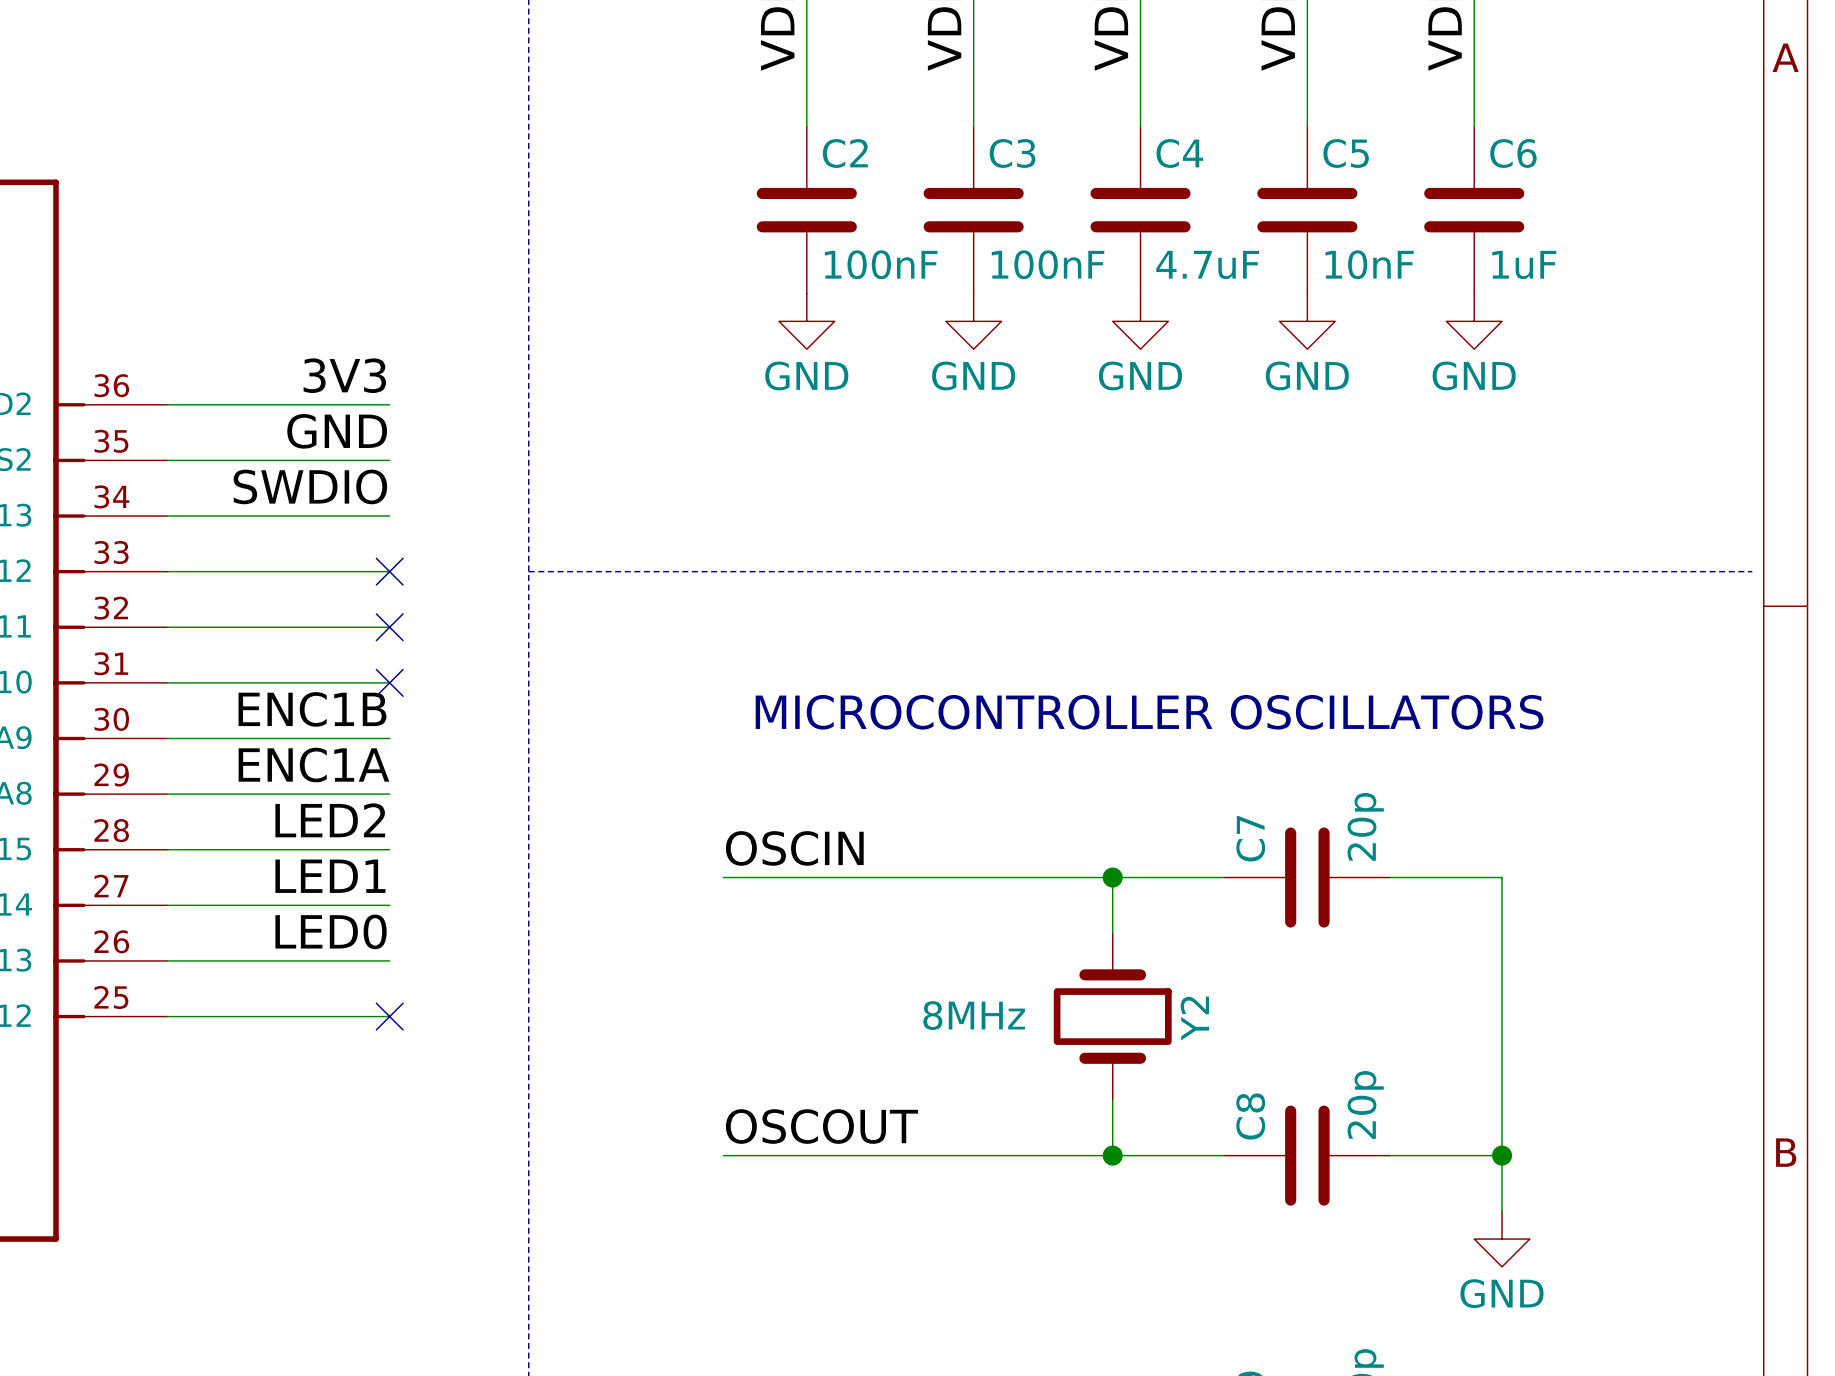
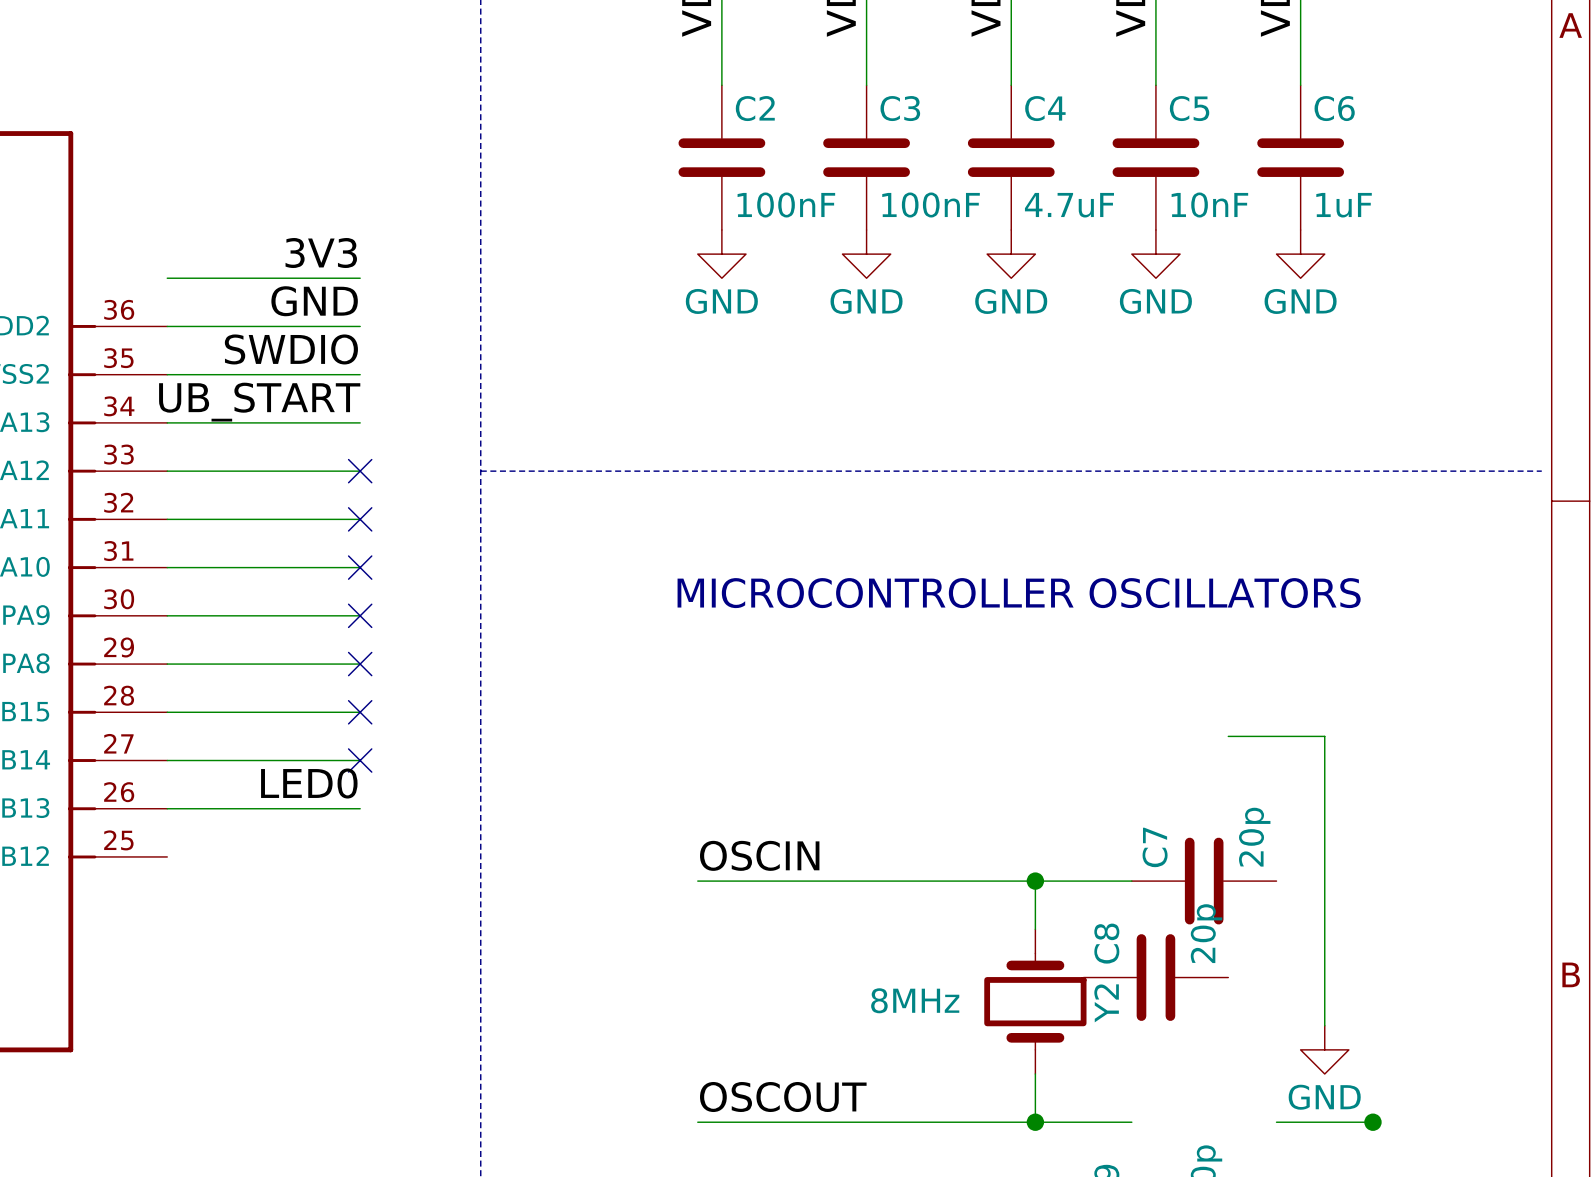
label: none -> 3V3 (321, 253)
wire: none -> (167, 278) (360, 278)
label: 3V3 (344, 375) -> GND (314, 301)
label: GND (337, 431) -> SWDIO (291, 349)
label: SWDIO (310, 486) -> UB_START (259, 402)
label: ENC1B (312, 709) -> none
no-connect mark: none -> (360, 615)
label: ENC1A (313, 765) -> none
no-connect mark: none -> (360, 664)
label: LED2 (330, 820) -> none
label position: OSCIN (794, 848) -> OSCIN (759, 855)
no-connect mark: none -> (360, 712)
label: LED1 (330, 876) -> none
wire: (723, 877) (1223, 877) -> (697, 881) (1131, 881)
wire: (1112, 877) (1112, 933) -> (1035, 881) (1035, 929)
junction: (1112, 877) -> none
C7 position: (1307, 877) -> (1204, 881)
no-connect mark: none -> (360, 760)
wire: (167, 1016) (389, 1016) -> none
no-connect mark: (389, 1016) -> none
Y2 position: (1112, 1016) -> (1035, 1001)
junction: none -> (1035, 881)
wire: (1112, 1100) (1112, 1155) -> (1035, 1074) (1035, 1122)
label position: OSCOUT (822, 1126) -> OSCOUT (783, 1097)
wire: (723, 1155) (1223, 1155) -> (697, 1122) (1131, 1122)
junction: (1112, 1155) -> none
wire: (1390, 1155) (1502, 1155) -> (1276, 1122) (1372, 1122)
junction: (1502, 1155) -> none
junction: none -> (1035, 1122)
junction: none -> (1372, 1122)

